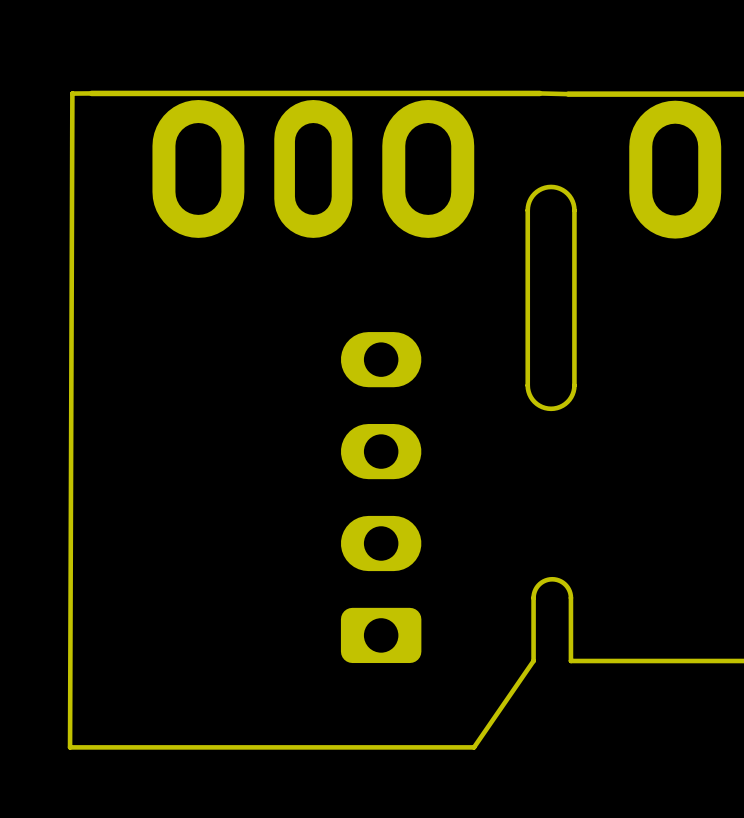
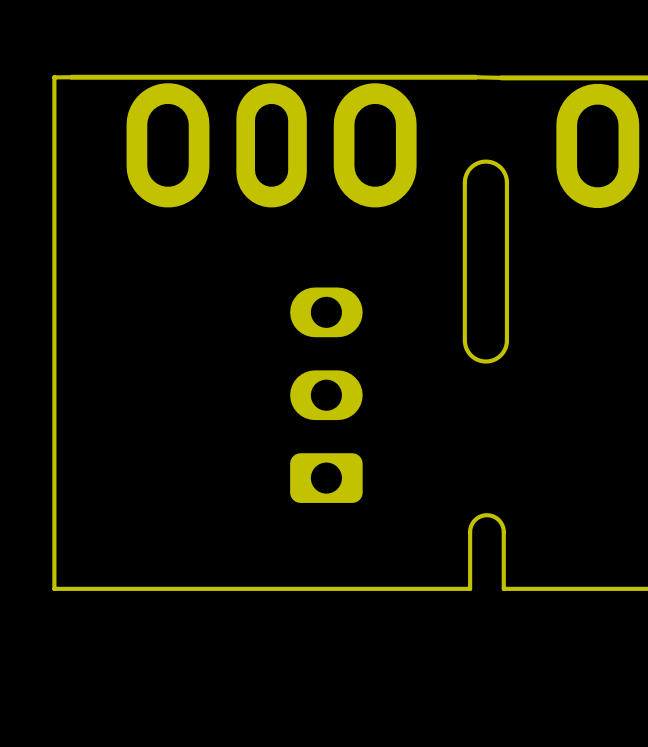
board edge: (72, 93) (70, 747) (474, 747) (533, 660) -> (54, 77) (54, 588) (470, 588)
part: none -> (326, 395)
part: (381, 497) -> none

